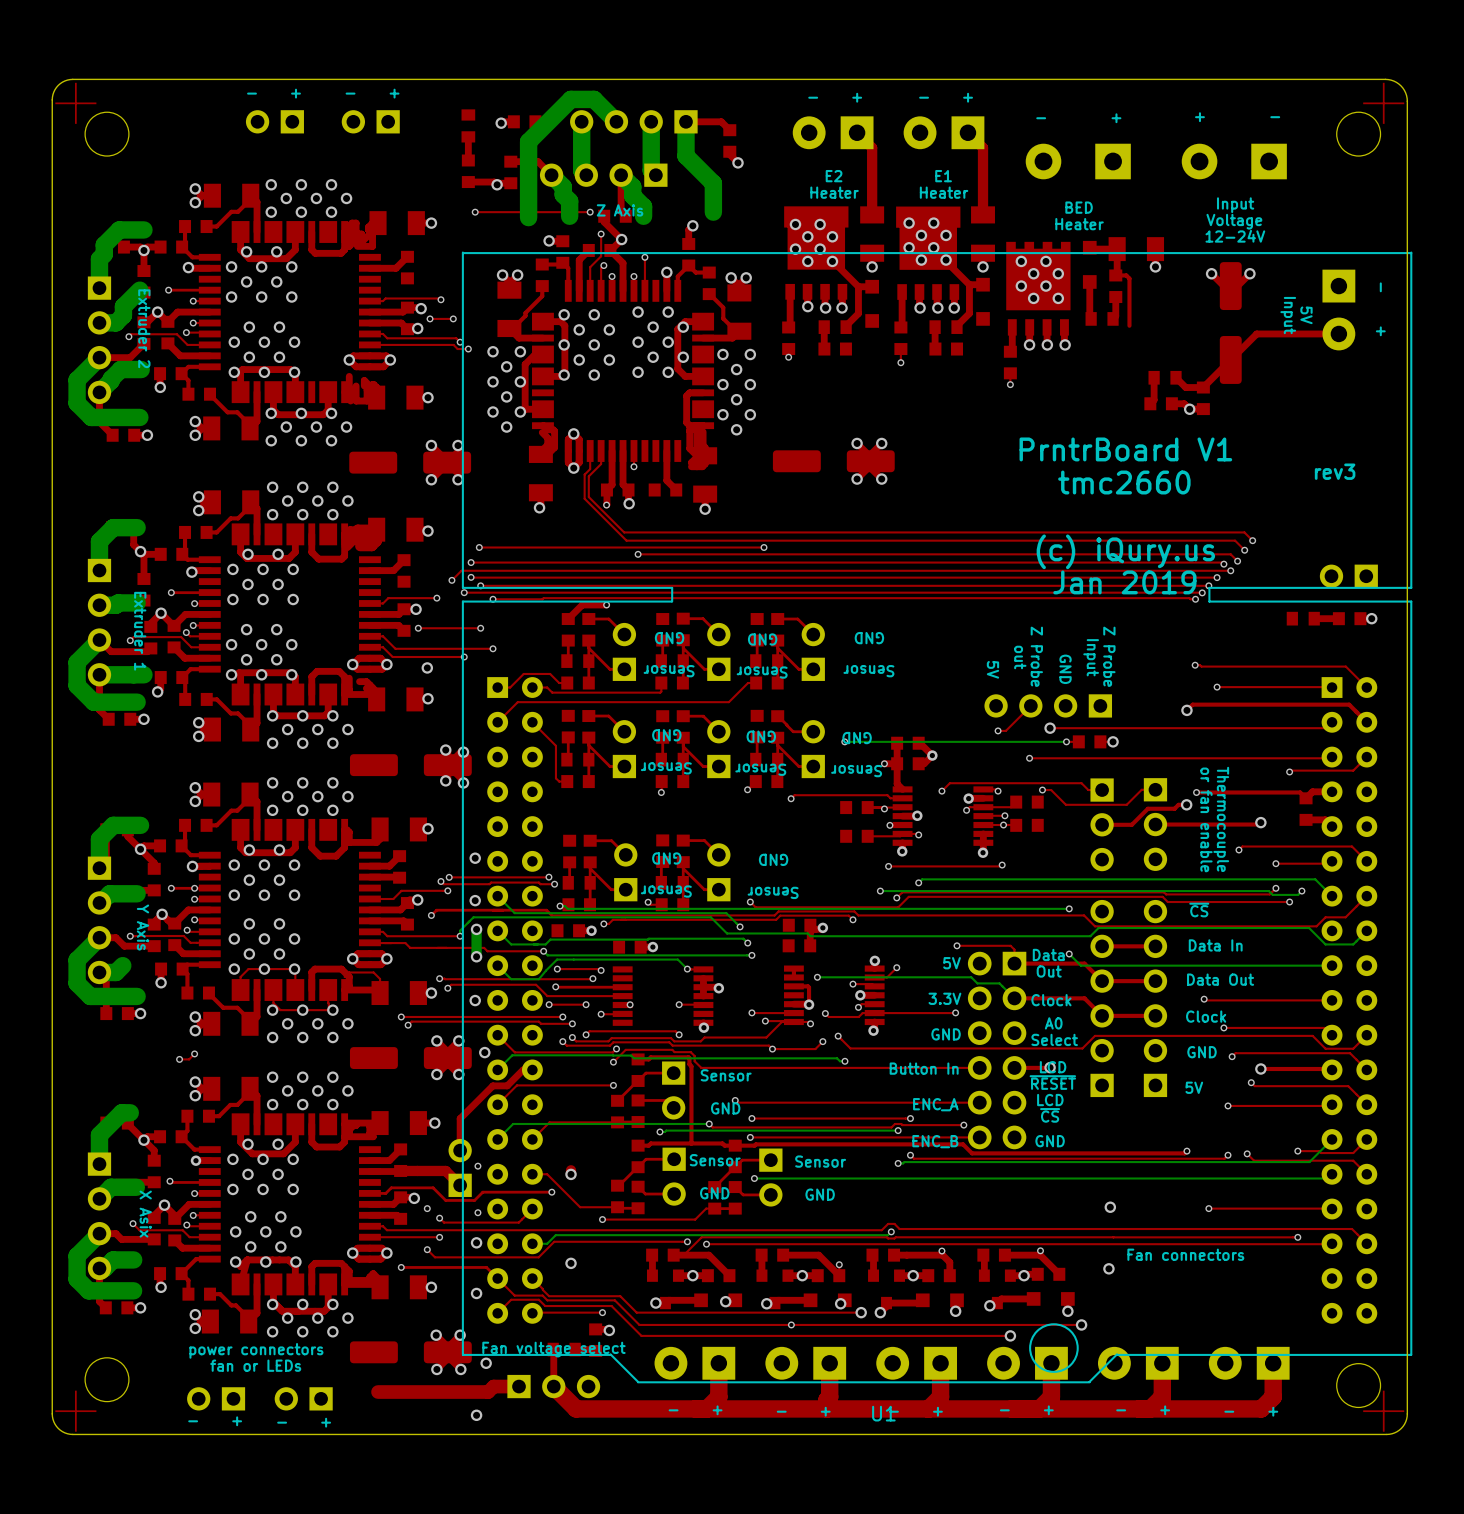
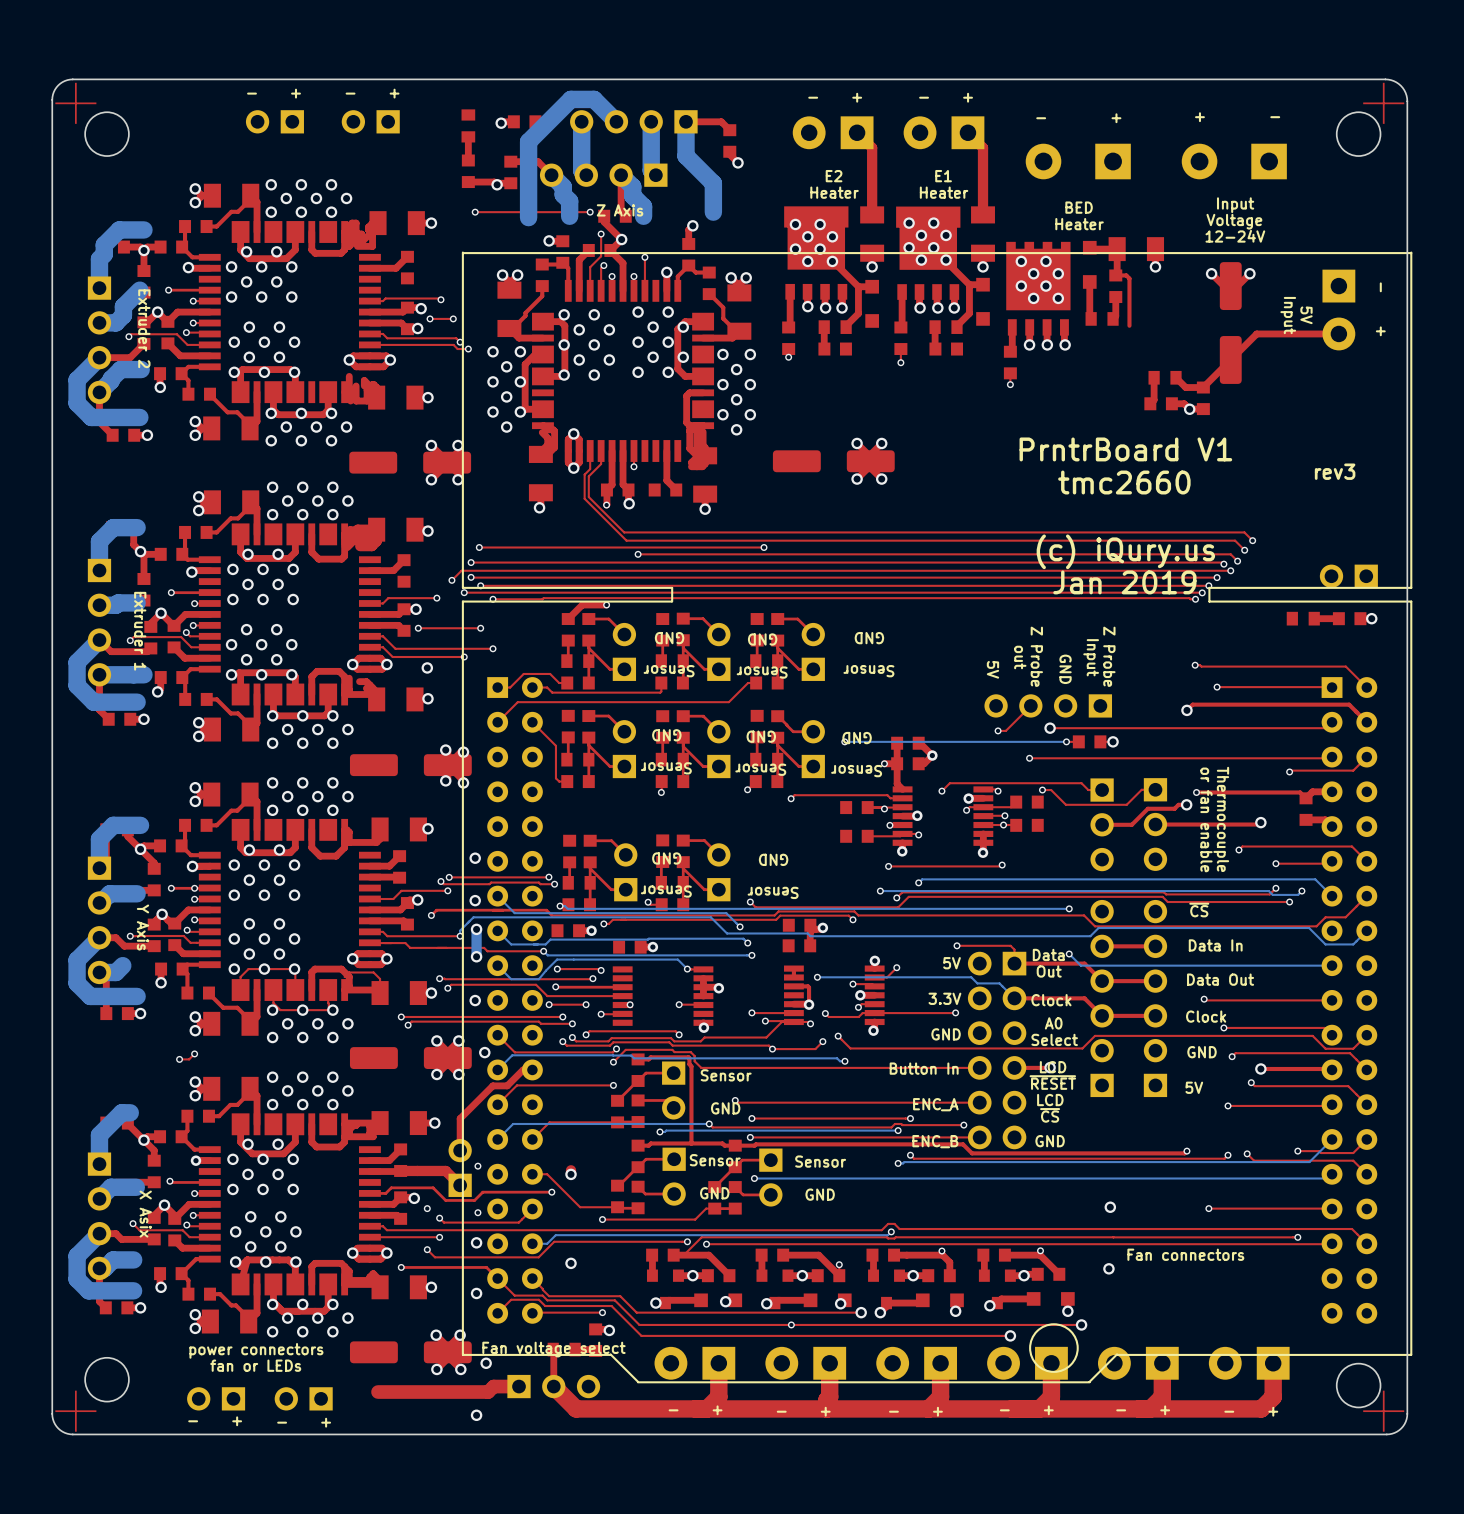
U1 name: U1 (883, 1413) -> none

